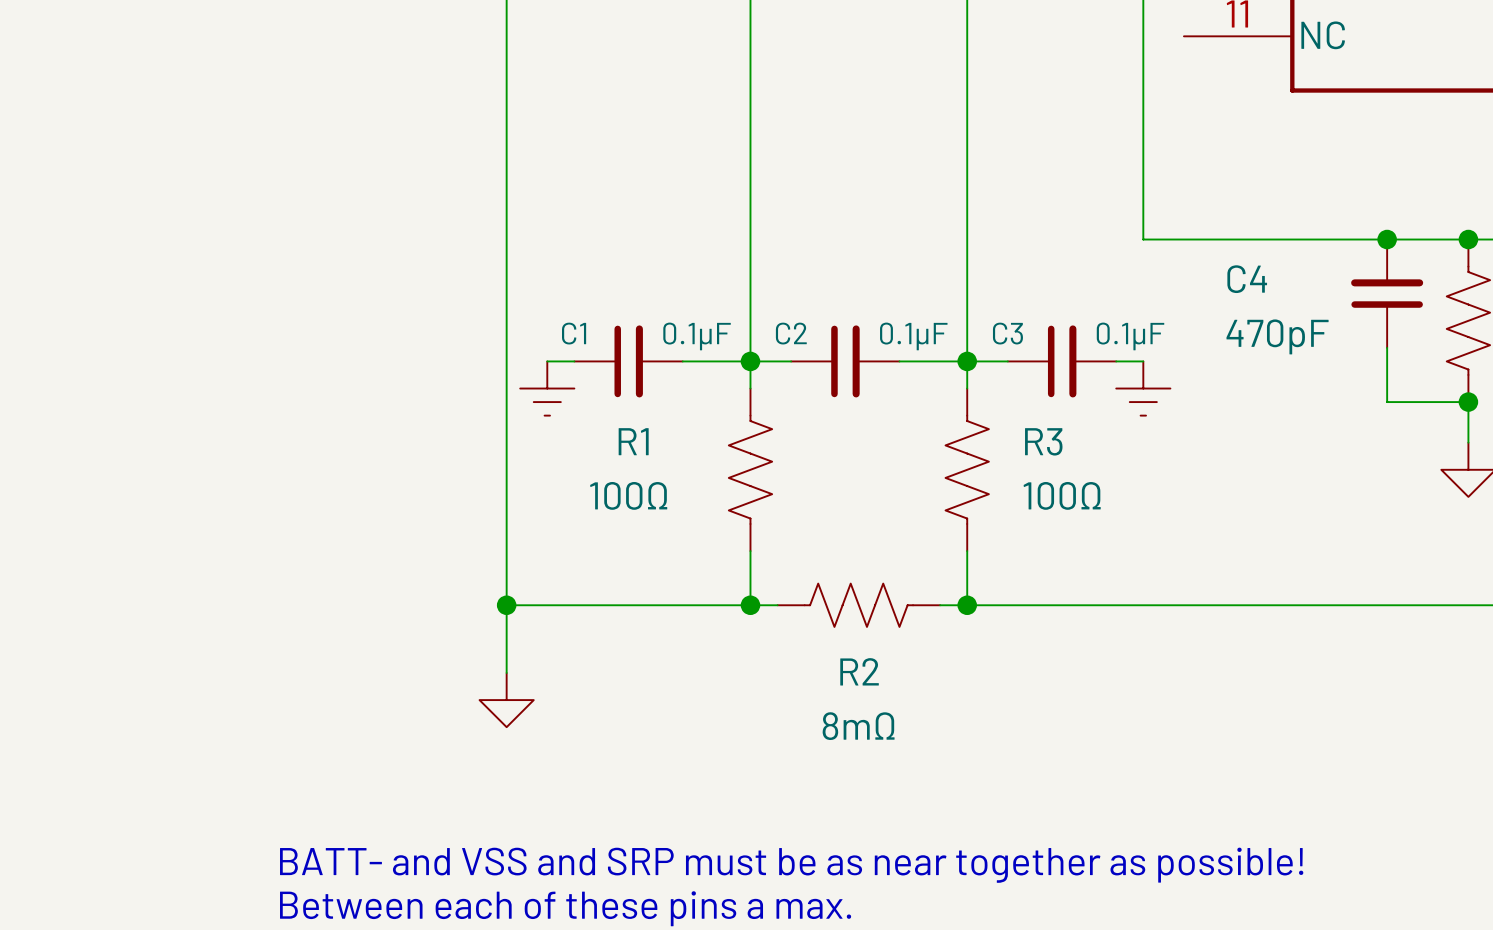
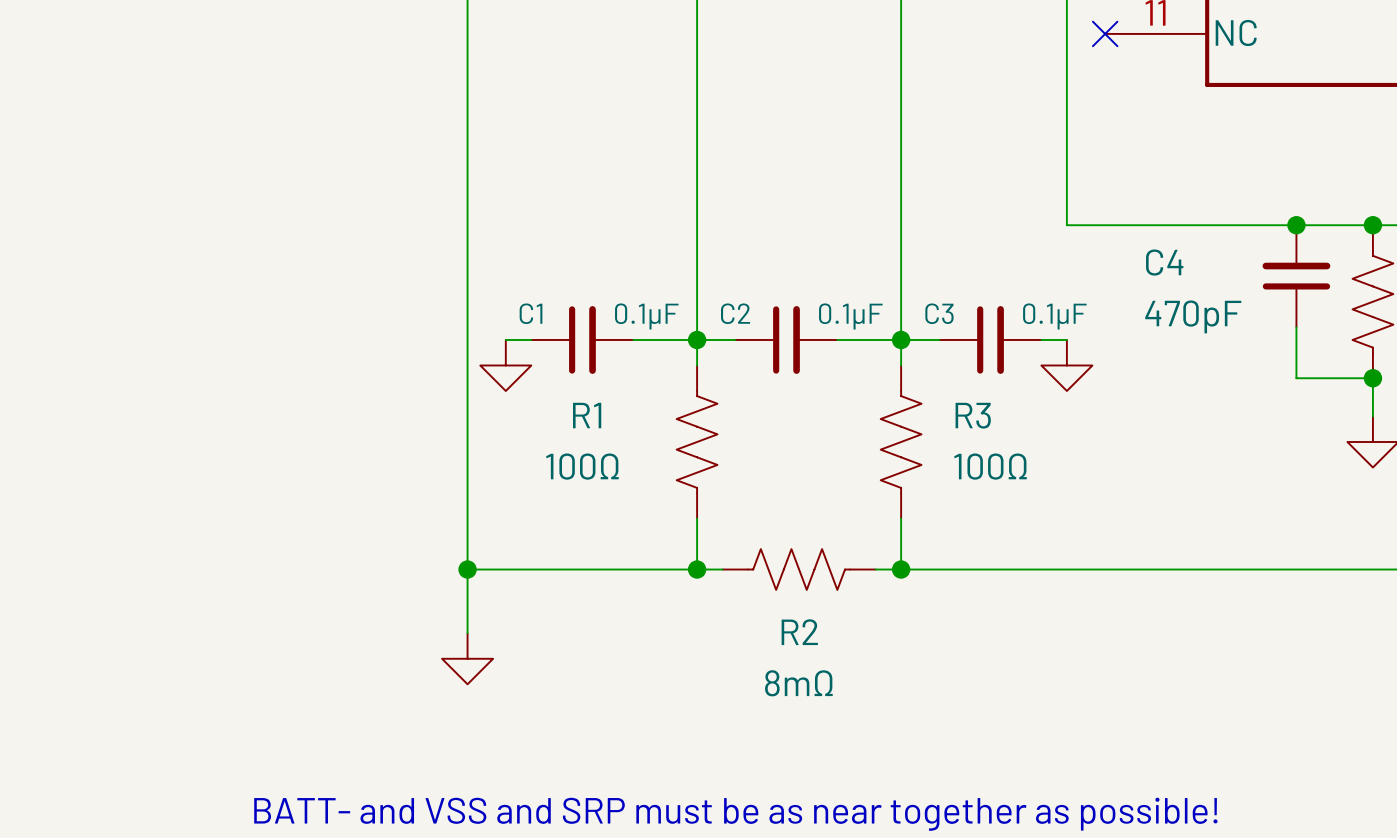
no-connect mark: none -> (1105, 33)
power symbol shape: [520, 361, 575, 416] -> [480, 339, 532, 391]
power symbol shape: [1116, 361, 1171, 416] -> [1041, 339, 1093, 391]

